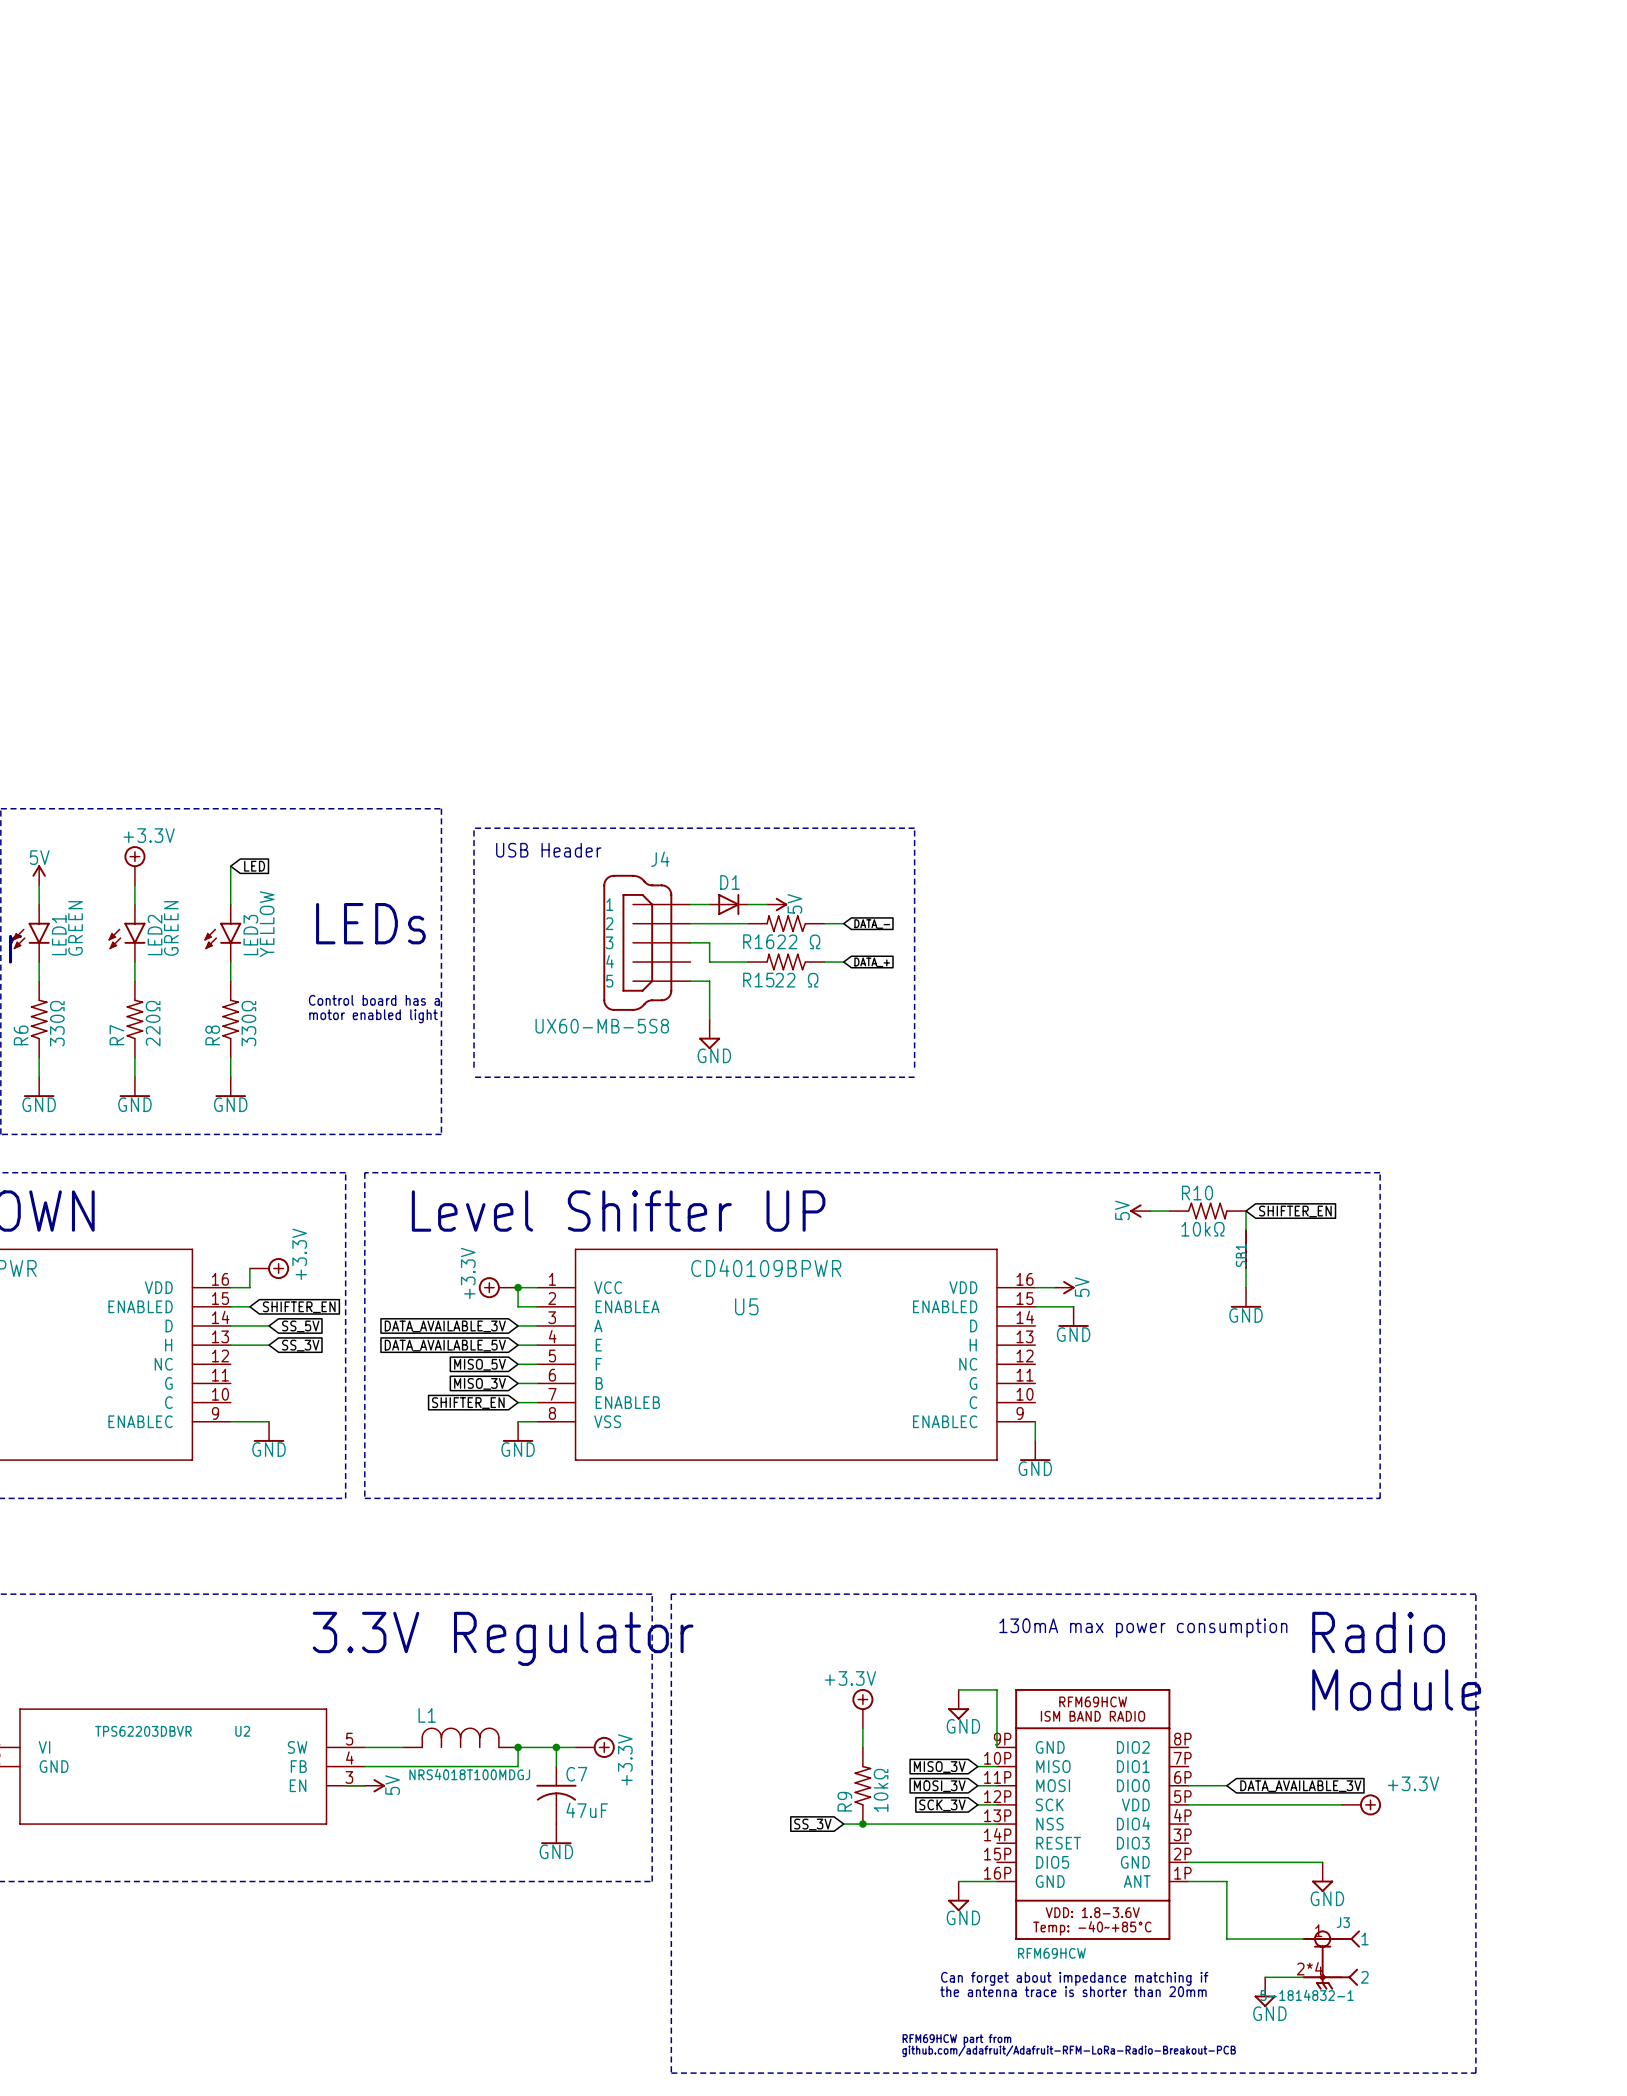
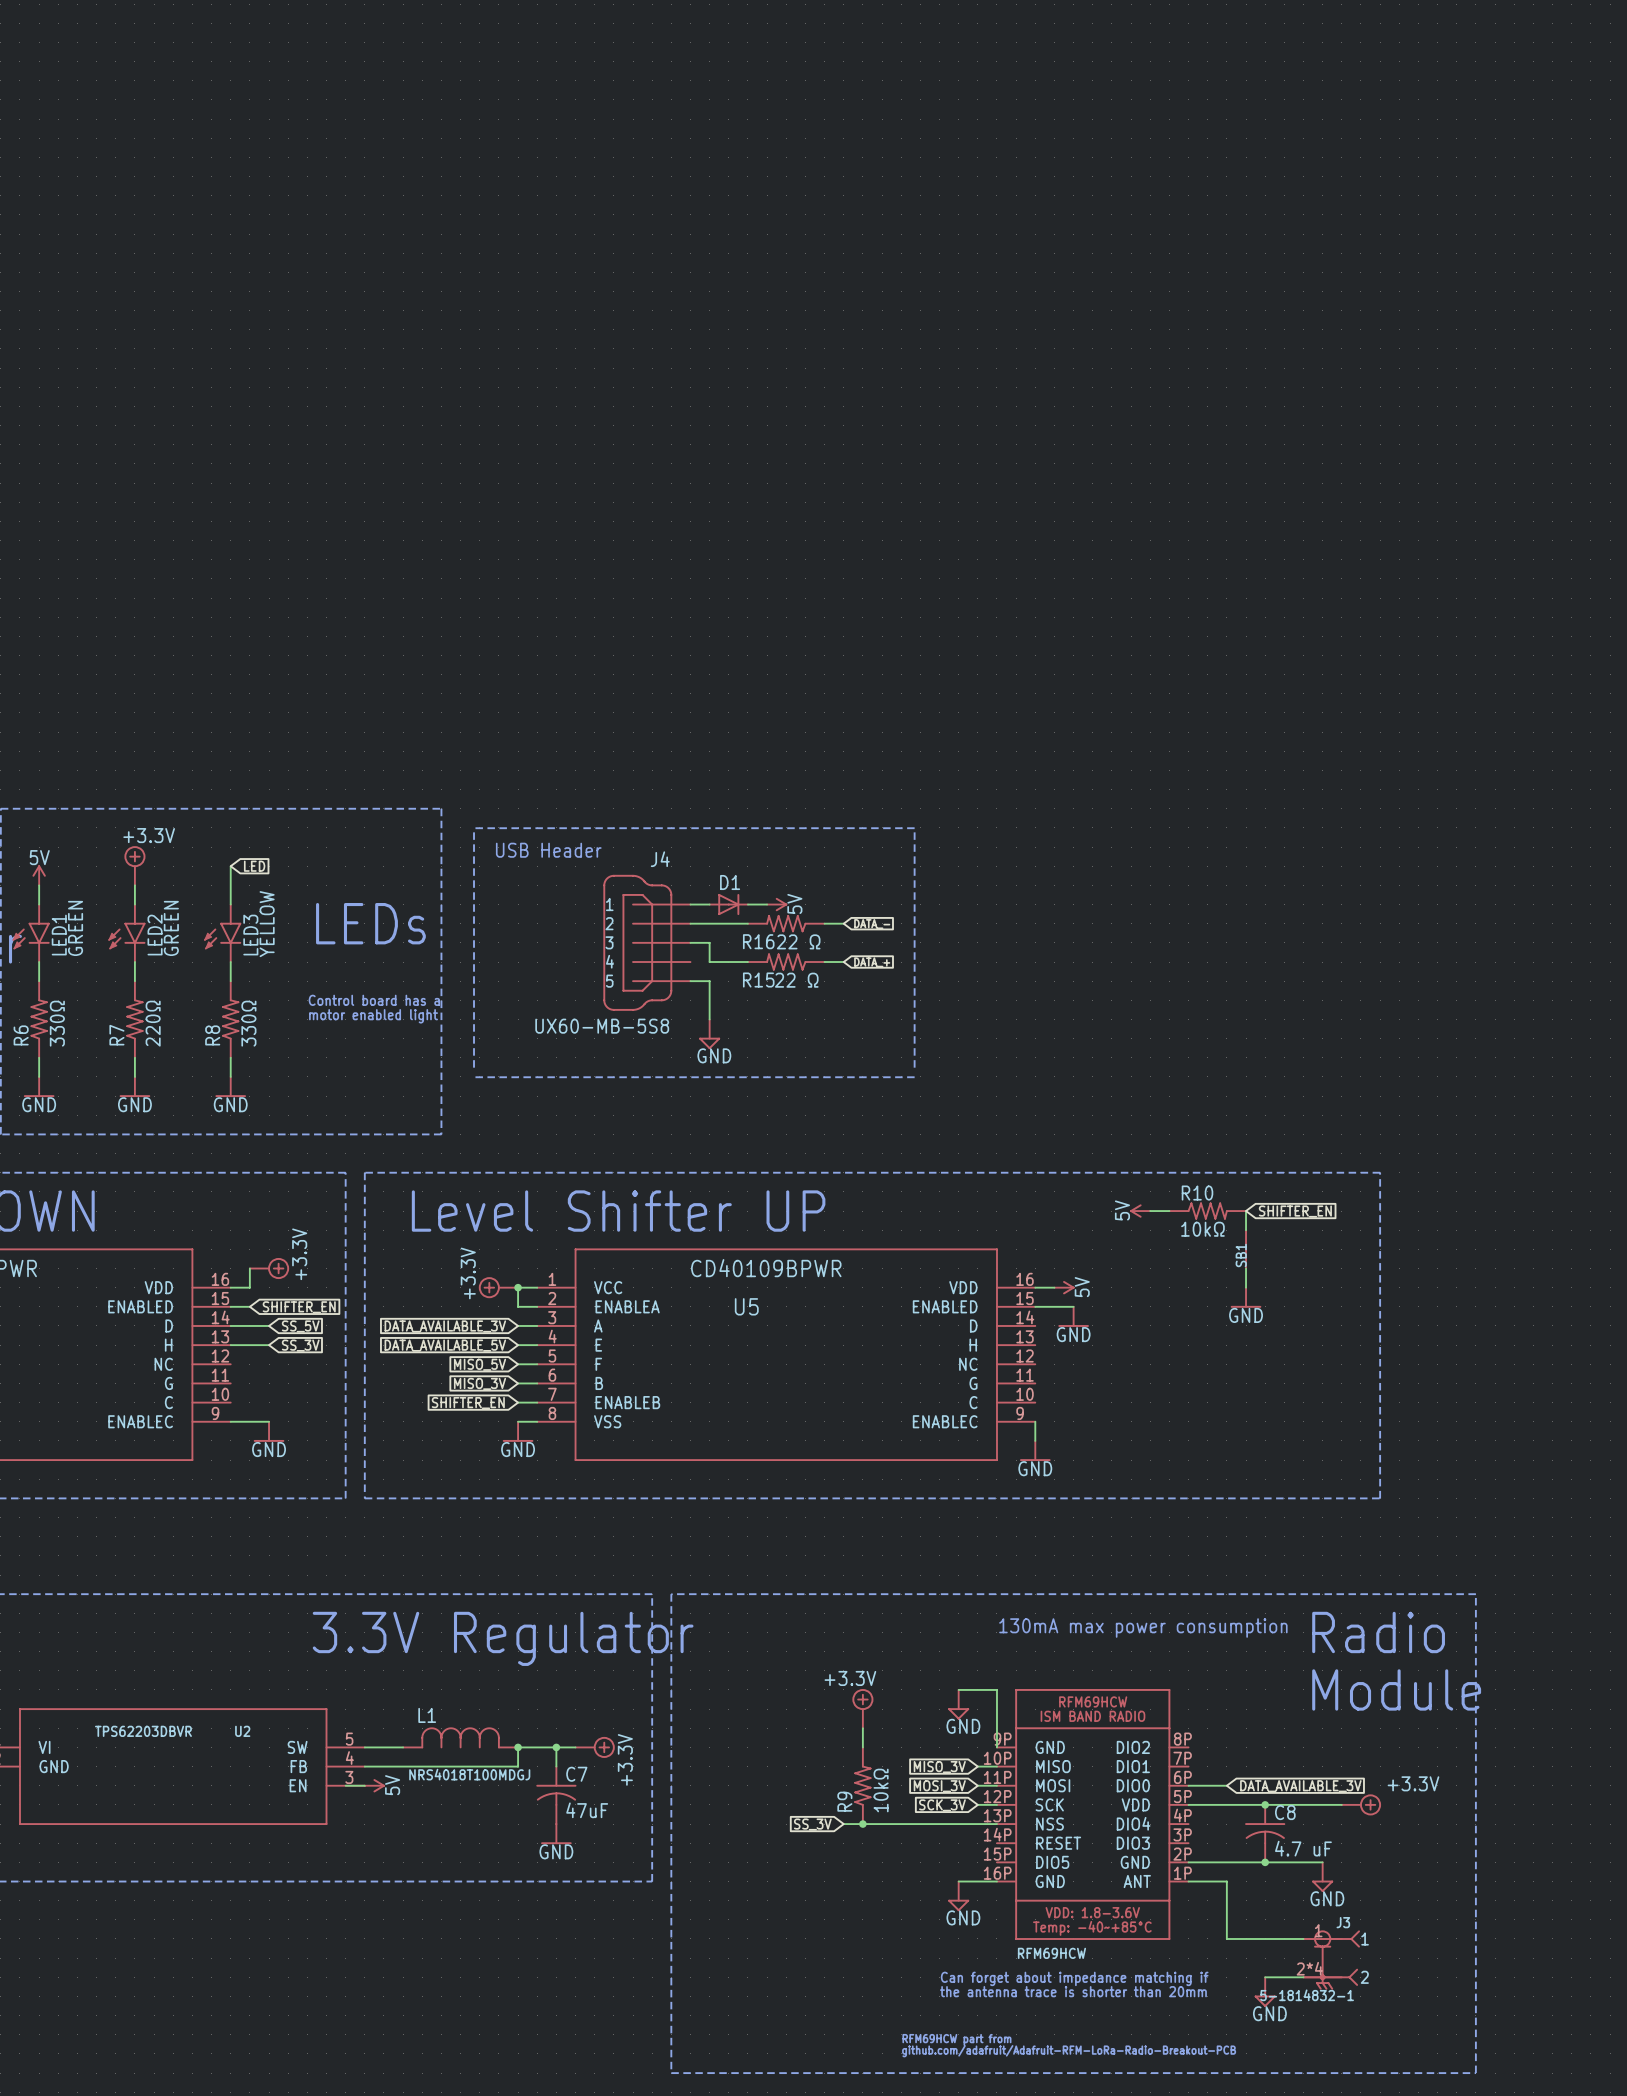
junction: none -> (1265, 1804)
C8: none -> 4.7 uF (1265, 1833)
junction: none -> (1265, 1862)

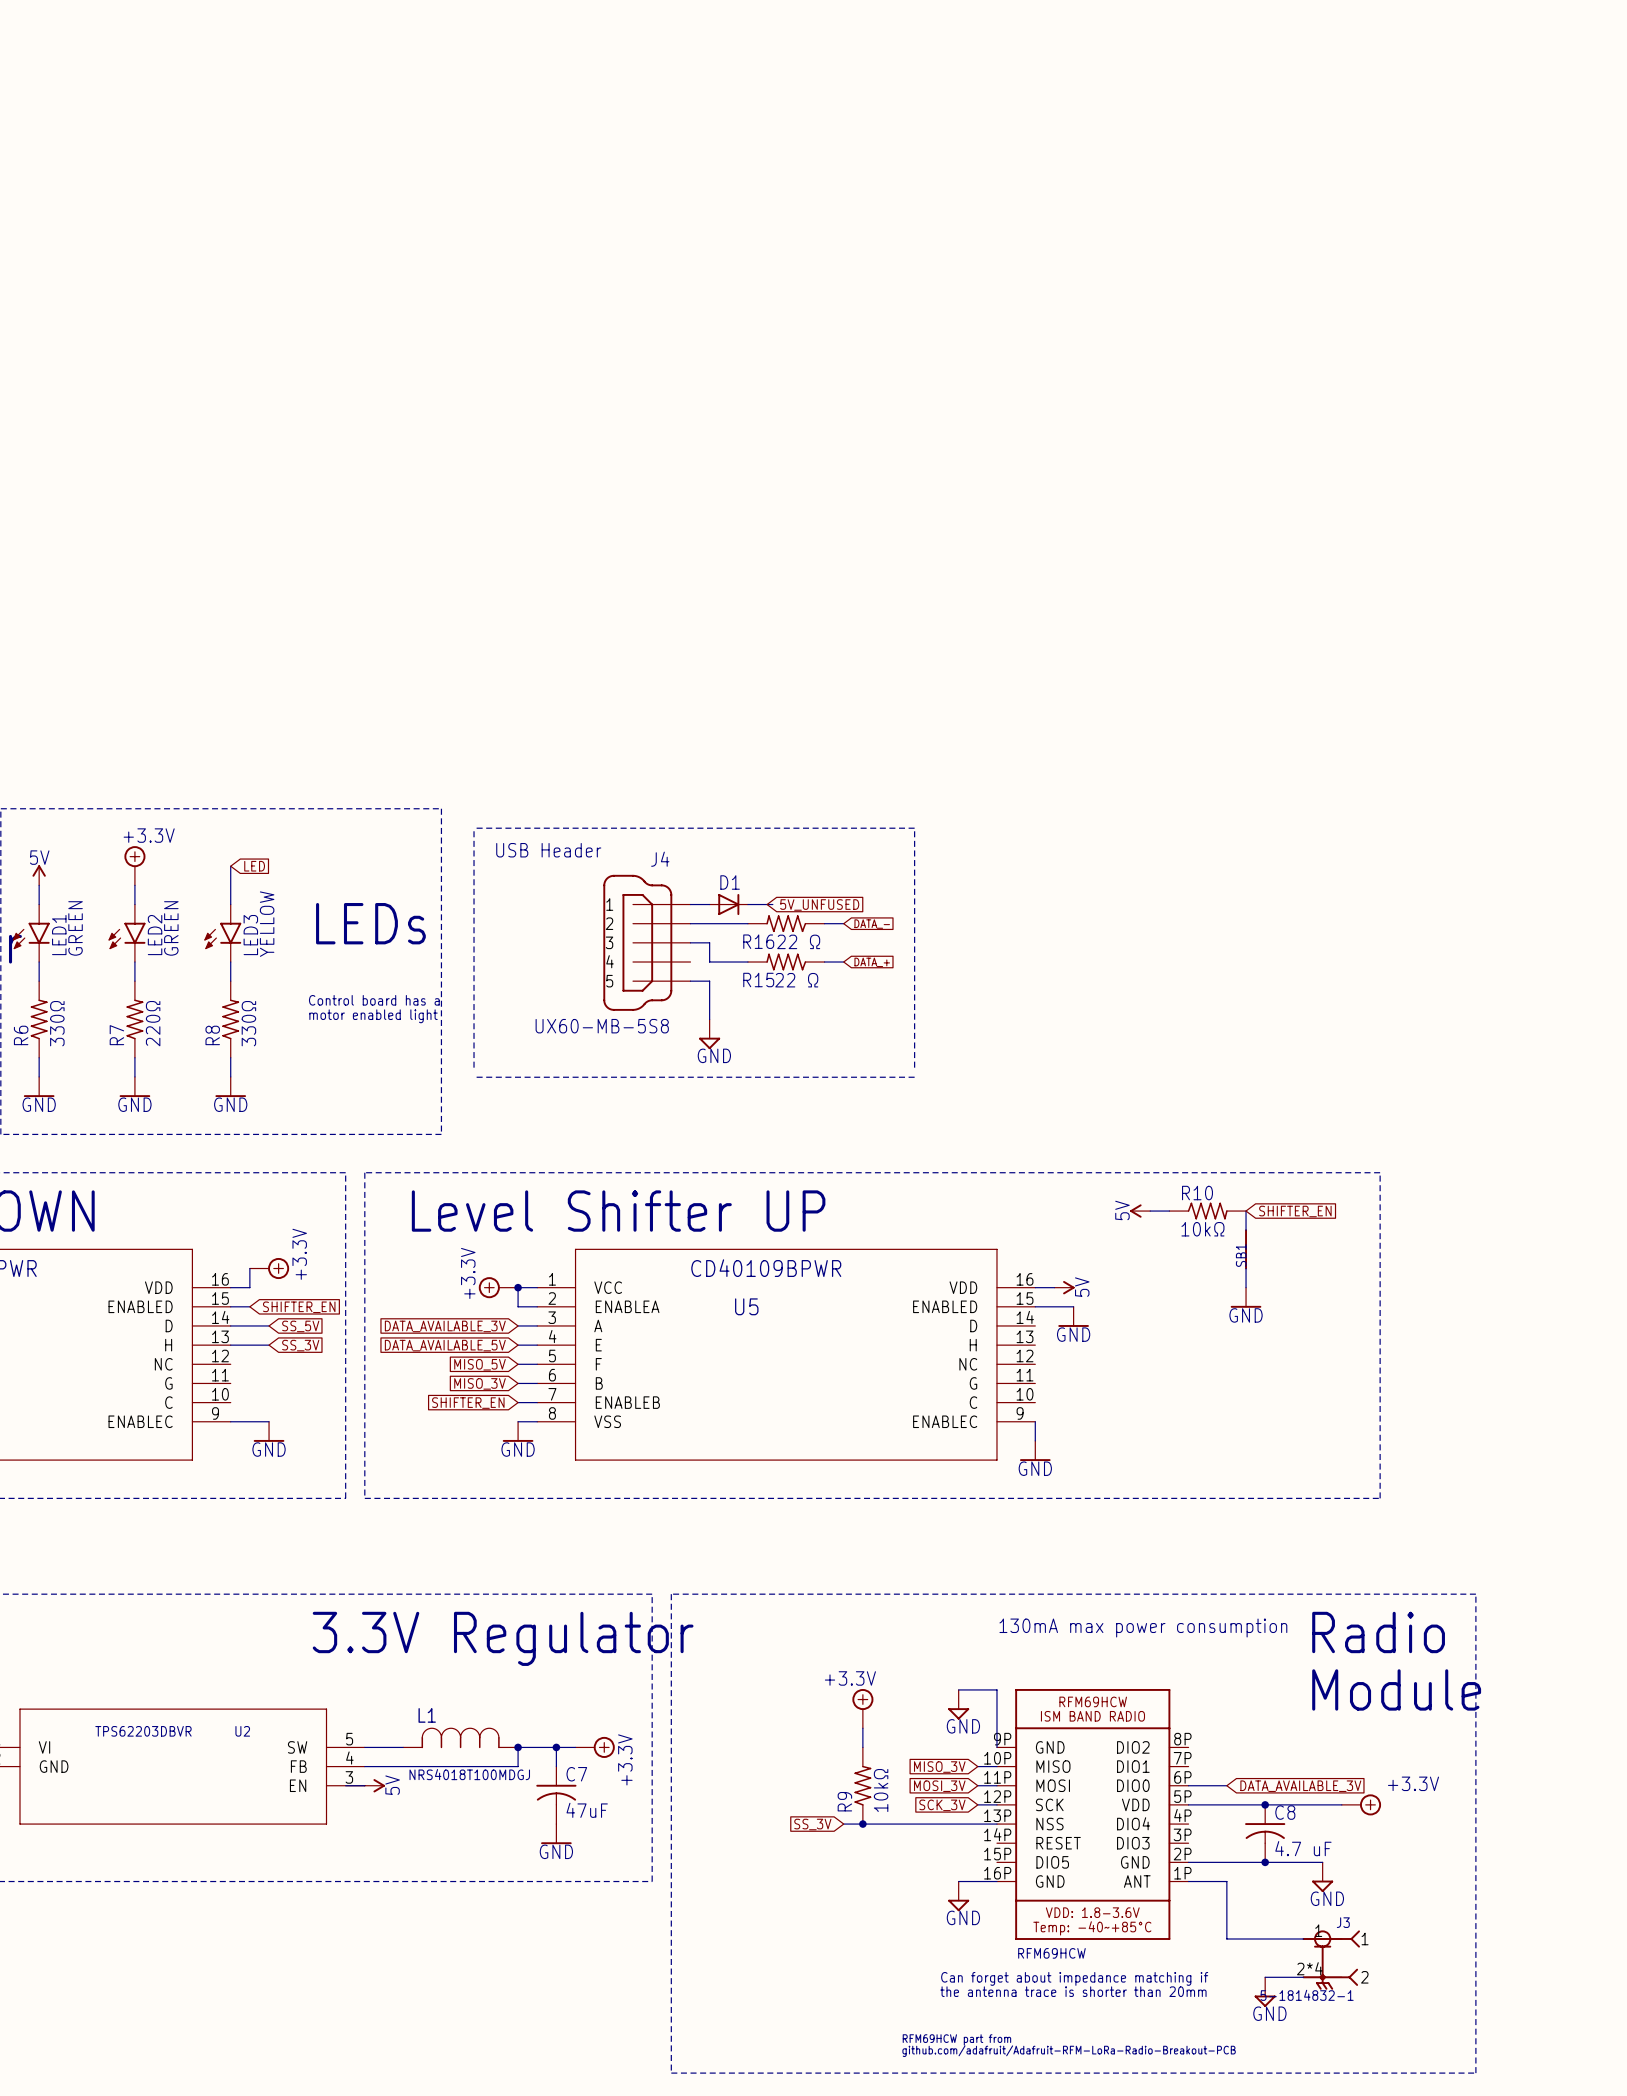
power symbol: 5V (777, 904) -> none
global label: none -> 5V_UNFUSED (819, 904)

